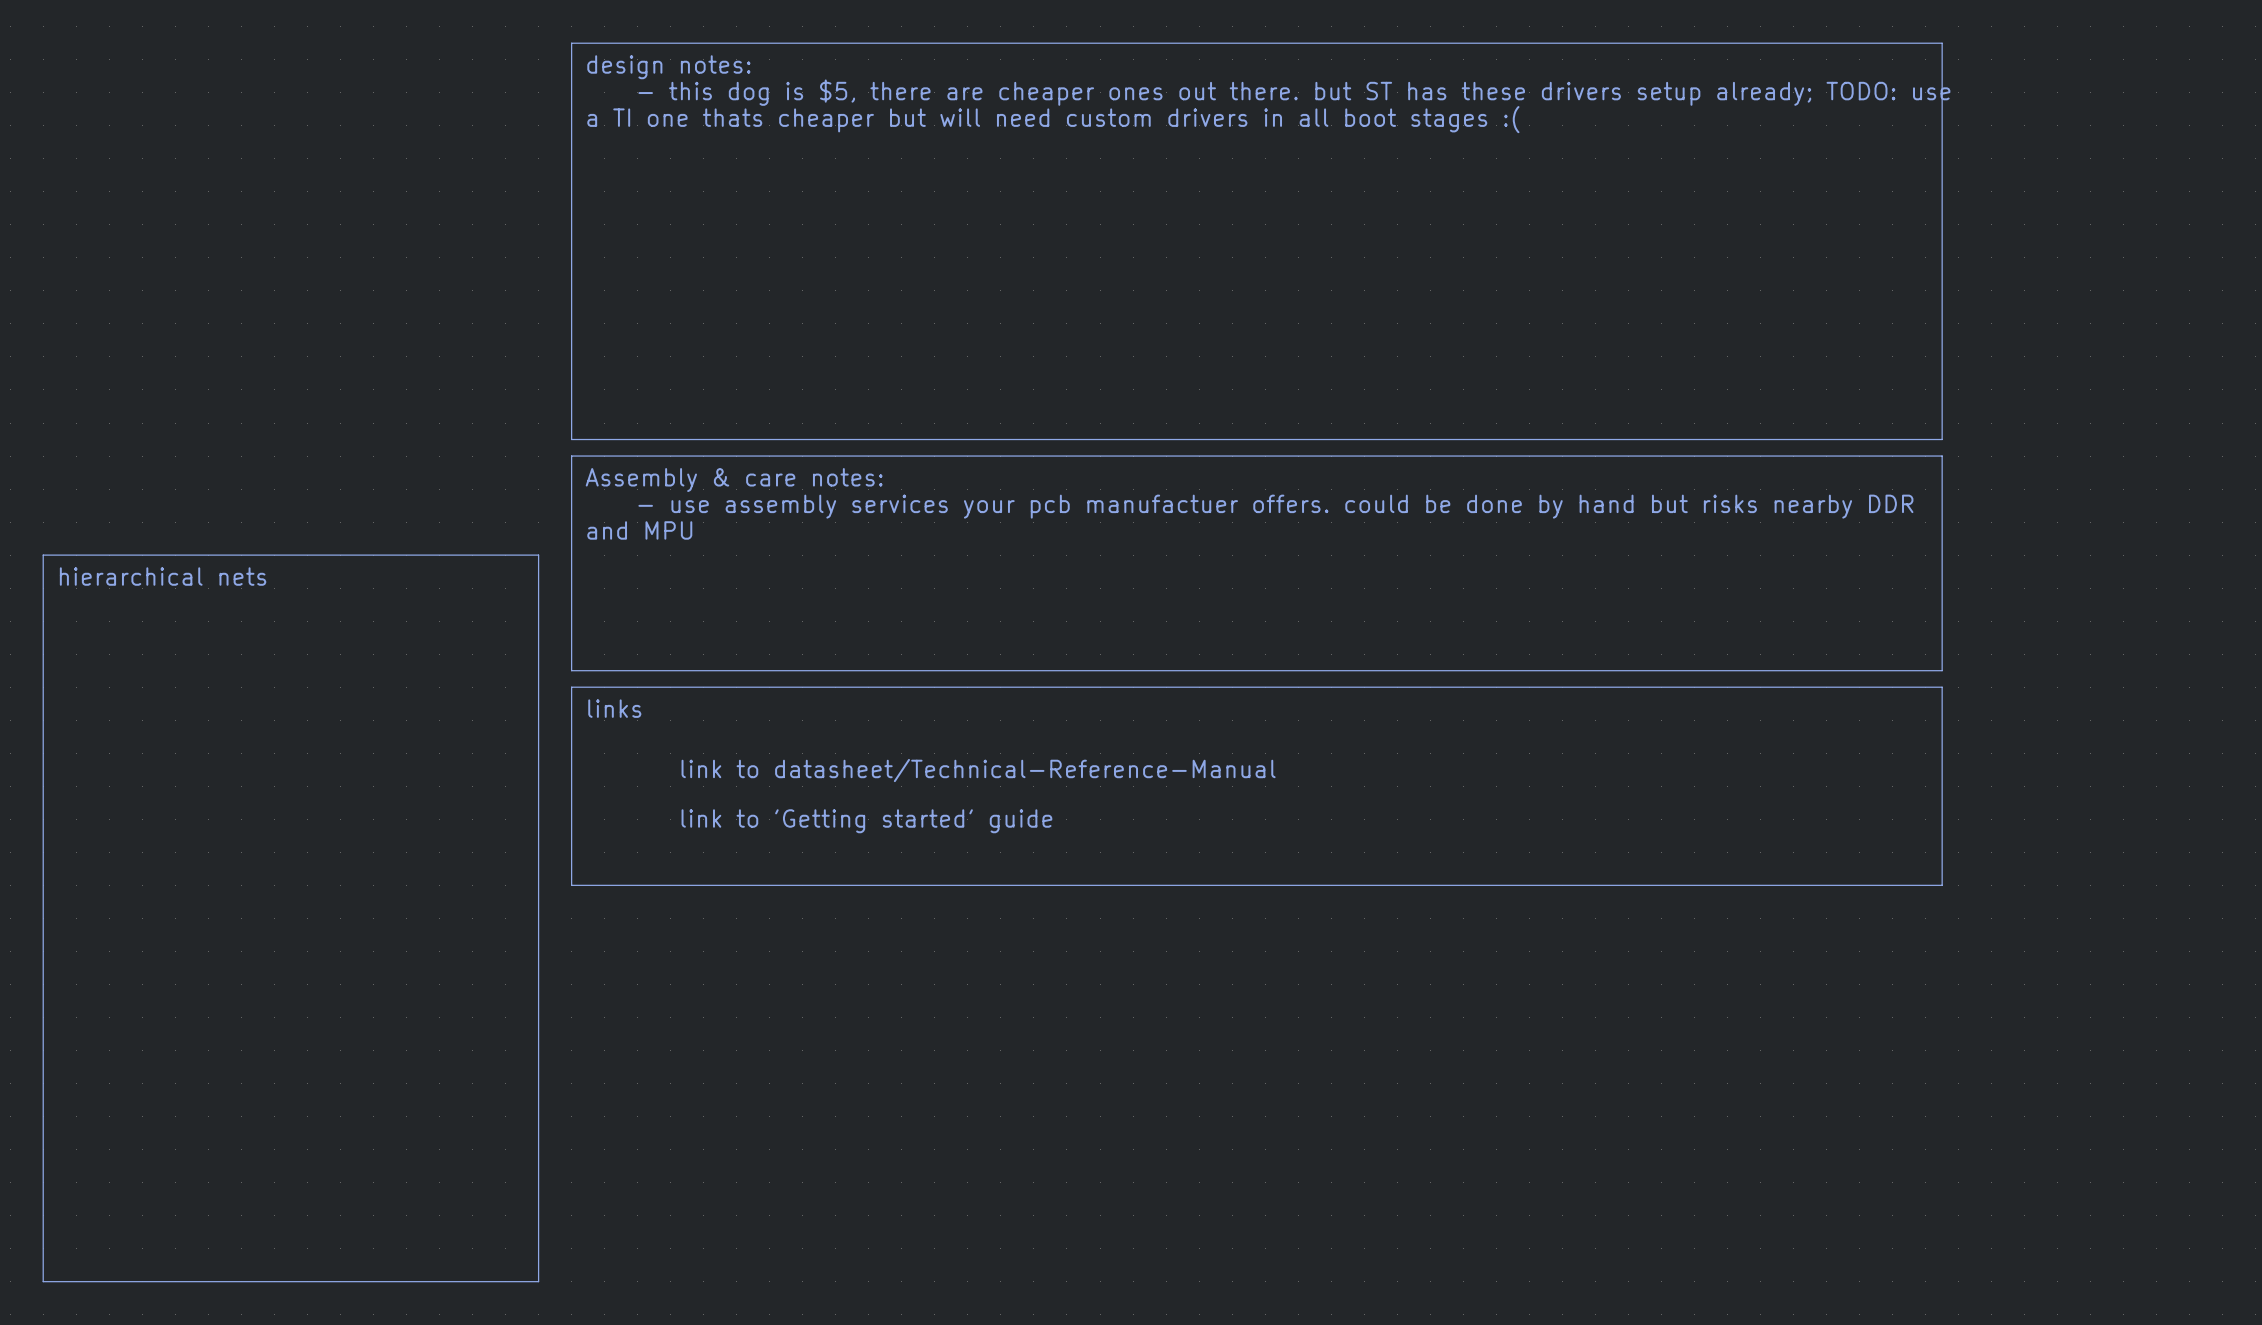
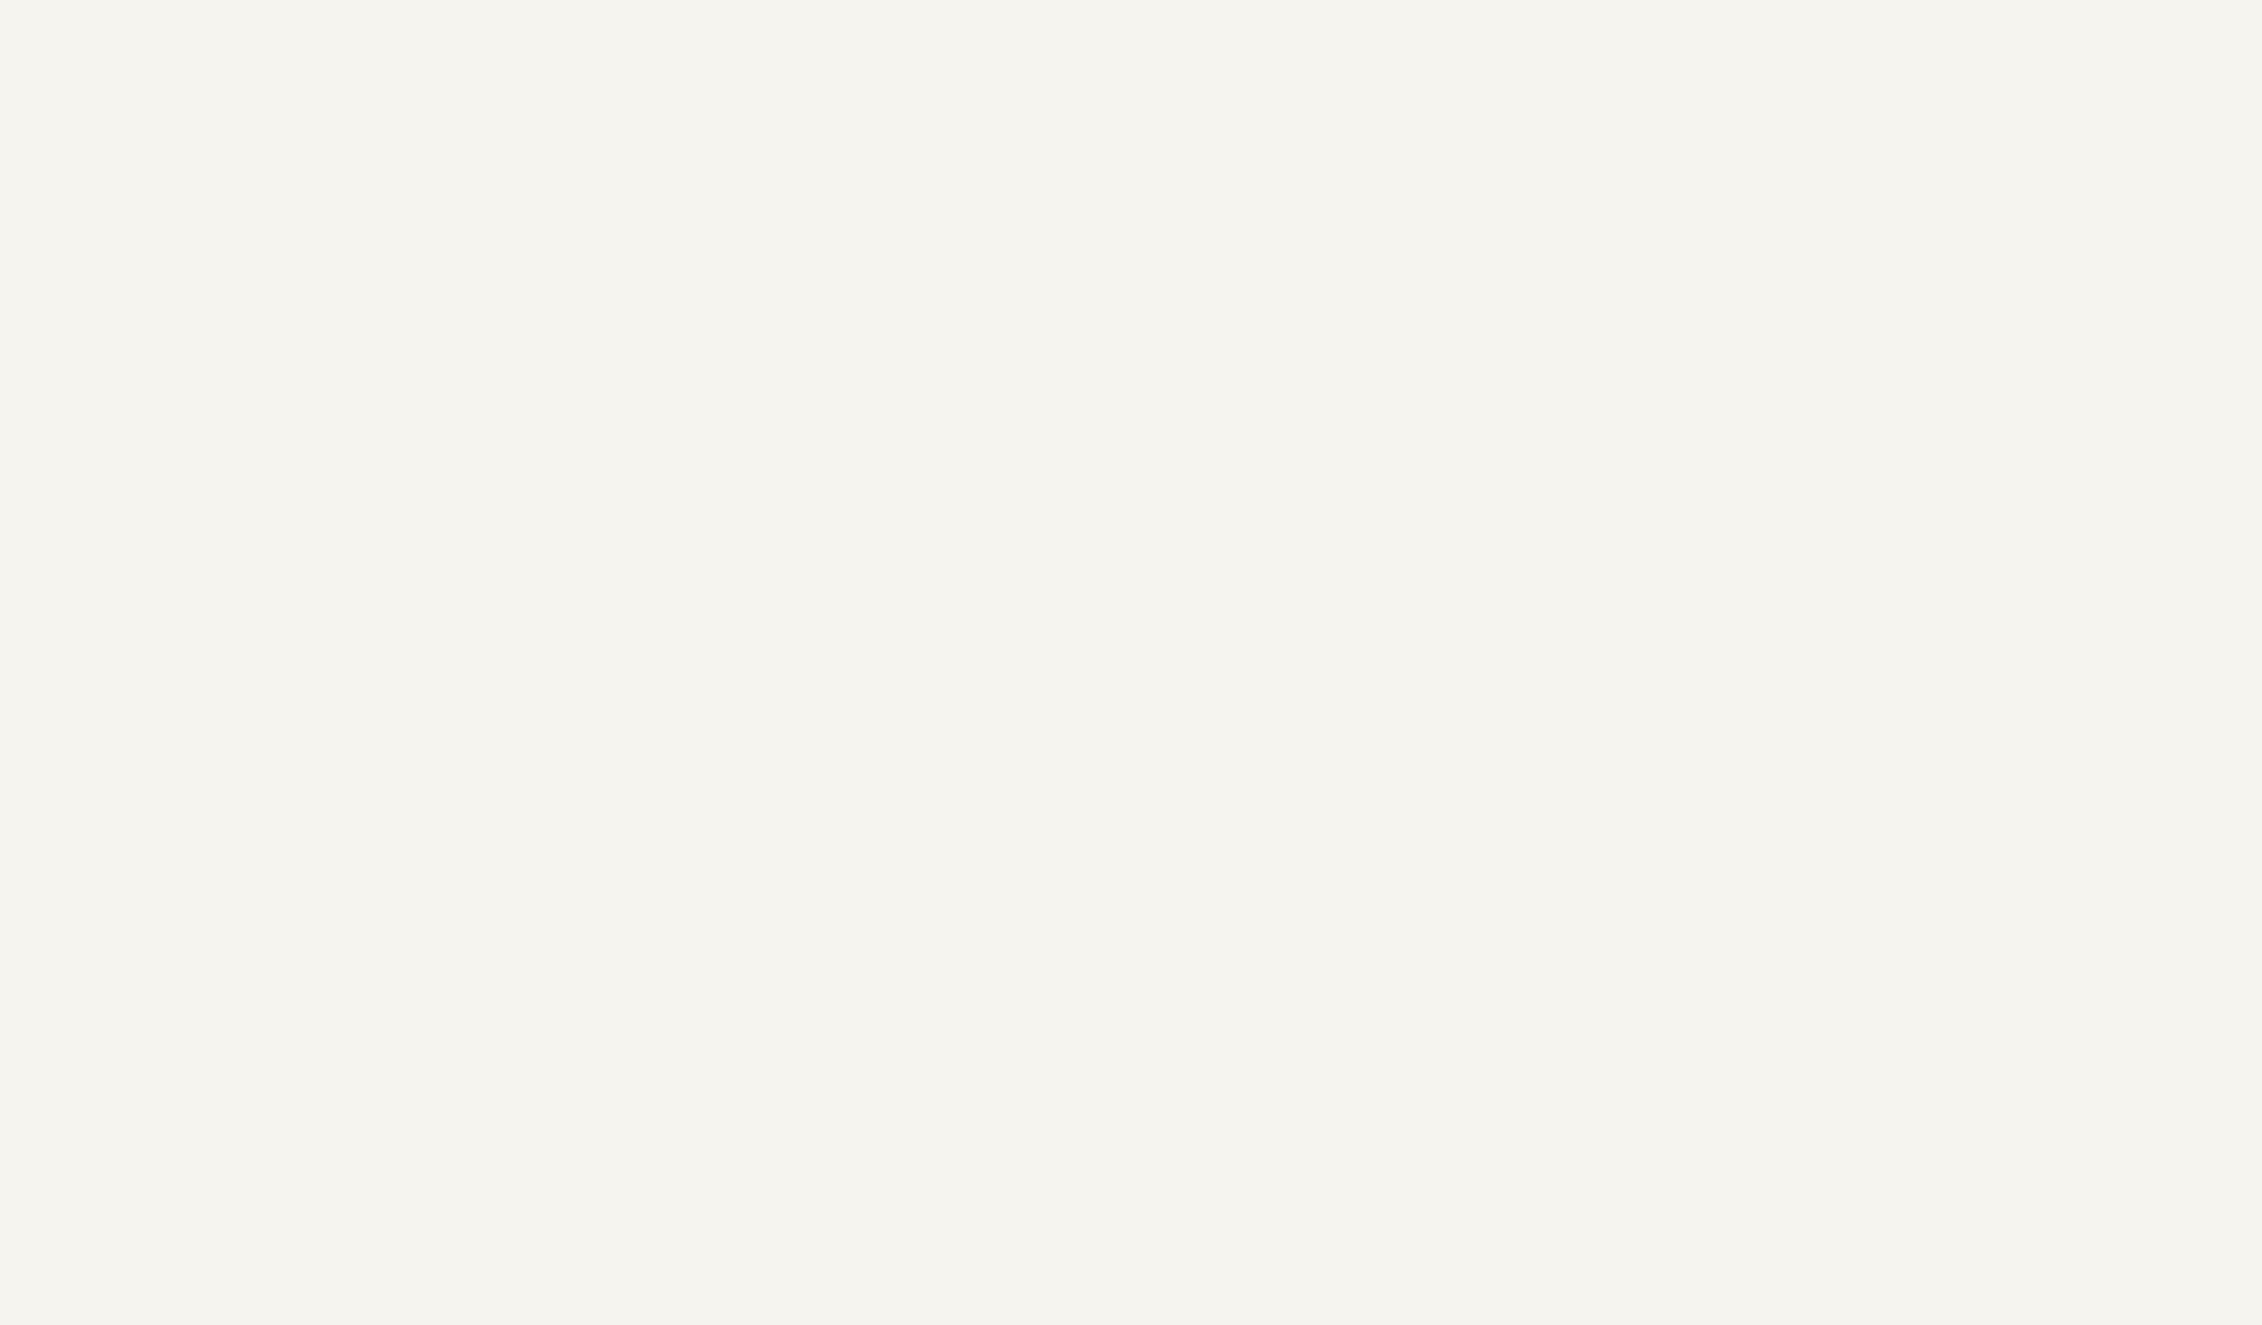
line: (571, 43) (1942, 43) (1942, 439) (571, 439) (571, 43) -> none
text: design notes: (668, 67) -> none
text: - this dog is $5, there are cheaper ones out there. but ST has these drivers setup already; TODO: use (1294, 92) -> none
text: a TI one thats cheaper but will need custom drivers in all boot stages :( (1053, 119) -> none
line: (571, 456) (571, 670) (1942, 670) (1942, 456) (571, 456) -> none
text: Assembly & care notes: (734, 480) -> none
text: - use assembly services your pcb manufactuer offers. could be done by hand but risks nearby DDR (1275, 506) -> none
text: and MPU (639, 530) -> none
line: (43, 555) (538, 555) (538, 1281) (43, 1281) (43, 555) -> none
text: hierarchical nets (163, 576) -> none
line: (571, 687) (571, 885) (1942, 885) (1942, 687) (571, 687) -> none
text: links (614, 708) -> none
text: link to datasheet/Technical-Reference-Manual (978, 770) -> none
text: link to 'Getting started' guide (866, 821) -> none

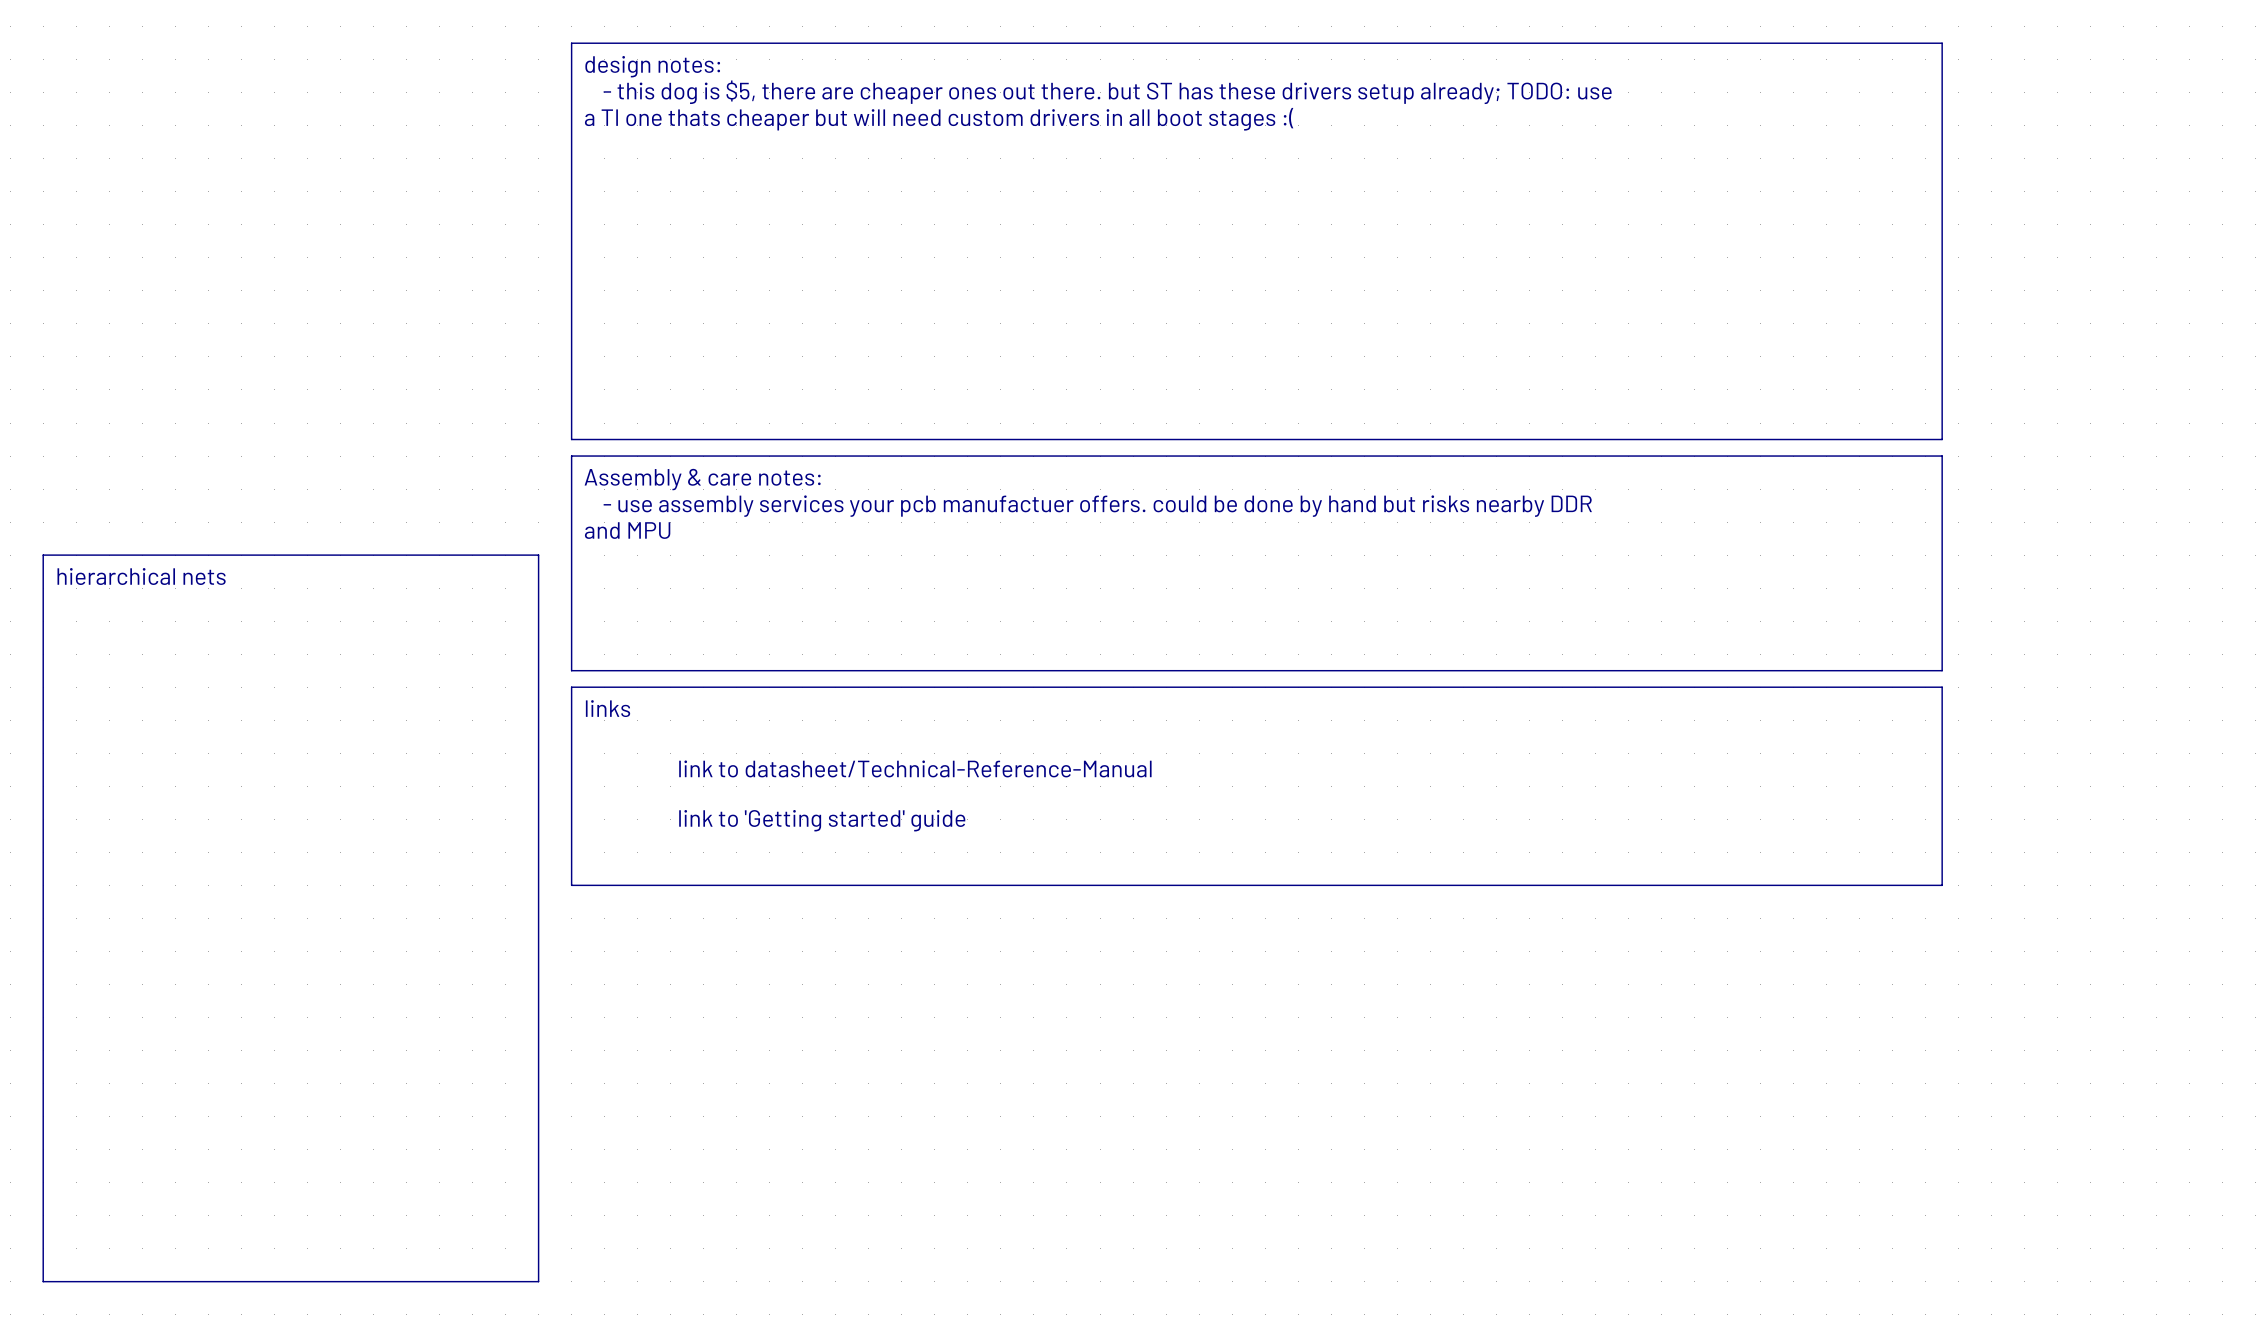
line: none -> (571, 43) (1942, 43) (1942, 439) (571, 439) (571, 43)
text: none -> design notes: (652, 66)
text: none -> - this dog is $5, there are cheaper ones out there. but ST has these drivers setup already; TODO: use (1107, 92)
text: none -> a TI one thats cheaper but will need custom drivers in all boot stages :( (939, 119)
line: none -> (571, 456) (571, 670) (1942, 670) (1942, 456) (571, 456)
text: none -> Assembly & care notes: (702, 479)
text: none -> - use assembly services your pcb manufactuer offers. could be done by hand but risks nearby DDR (1097, 506)
text: none -> and MPU (627, 530)
line: none -> (43, 555) (538, 555) (538, 1281) (43, 1281) (43, 555)
text: none -> hierarchical nets (141, 576)
line: none -> (571, 687) (571, 885) (1942, 885) (1942, 687) (571, 687)
text: none -> links (608, 708)
text: none -> link to datasheet/Technical-Reference-Manual (915, 768)
text: none -> link to 'Getting started' guide (822, 820)

